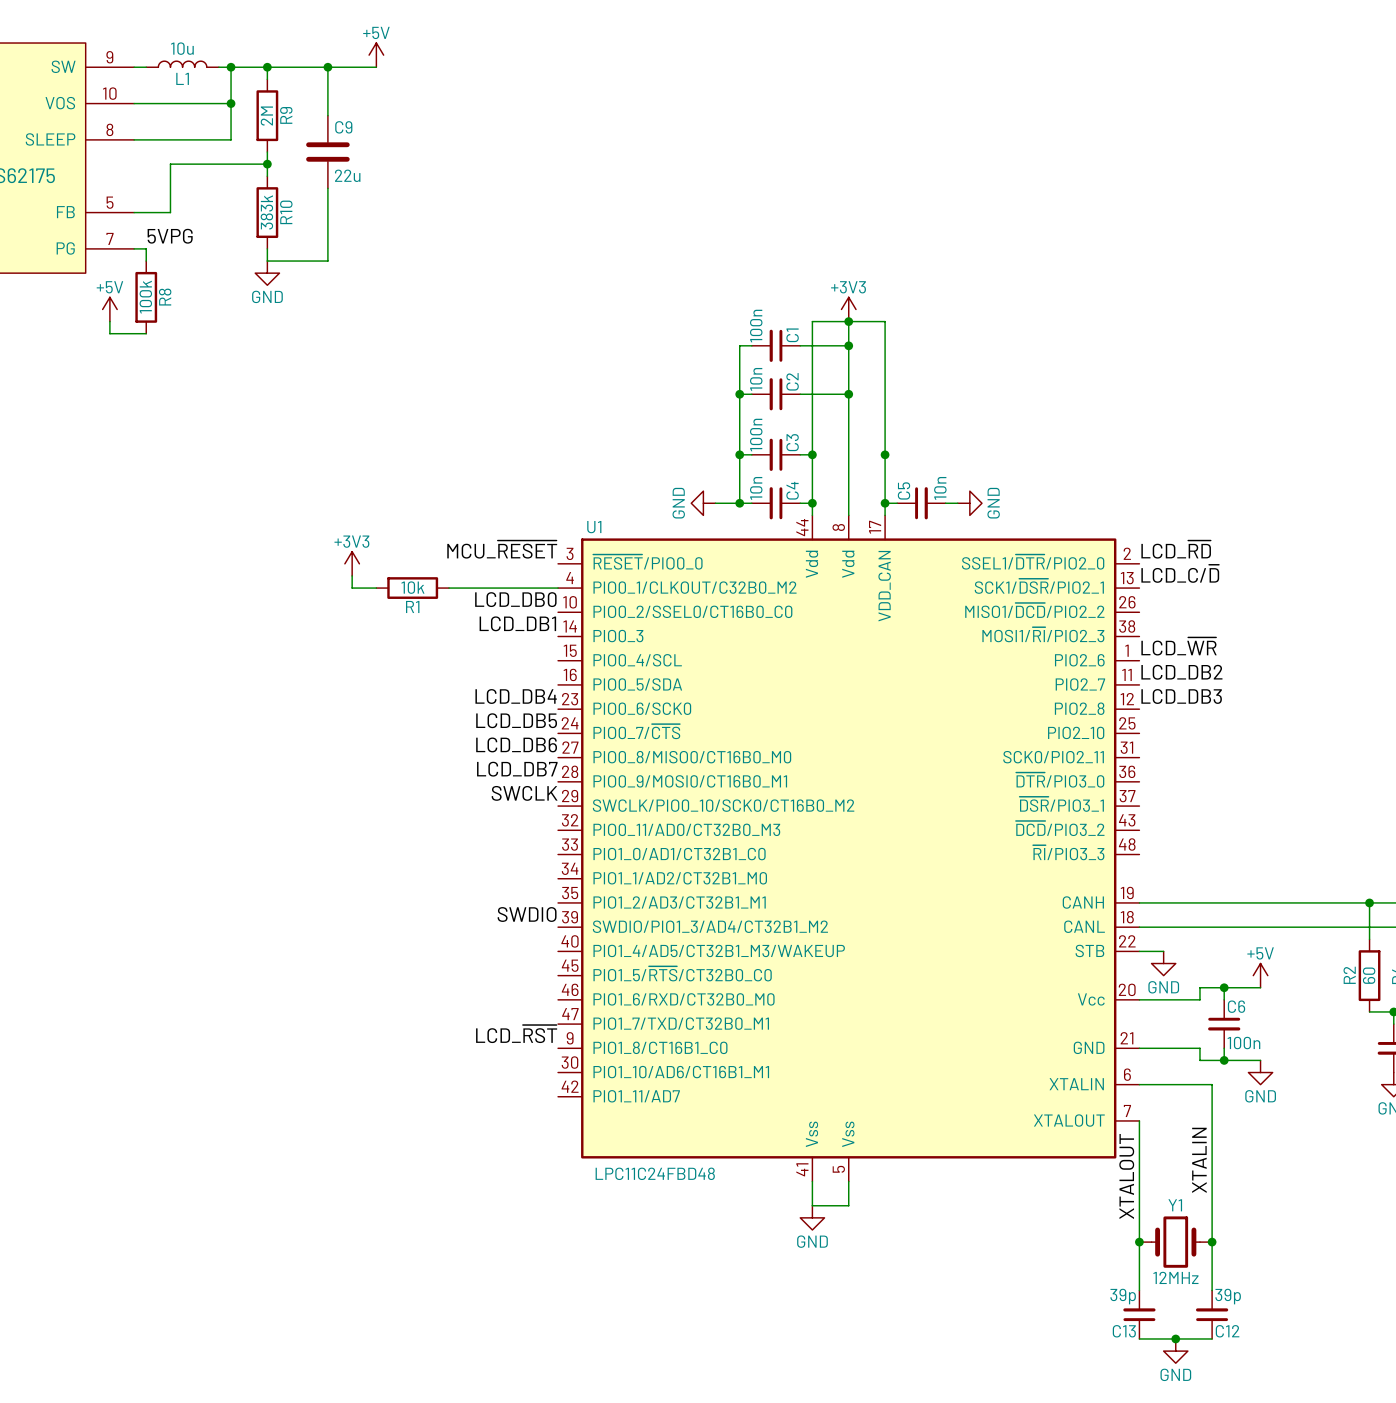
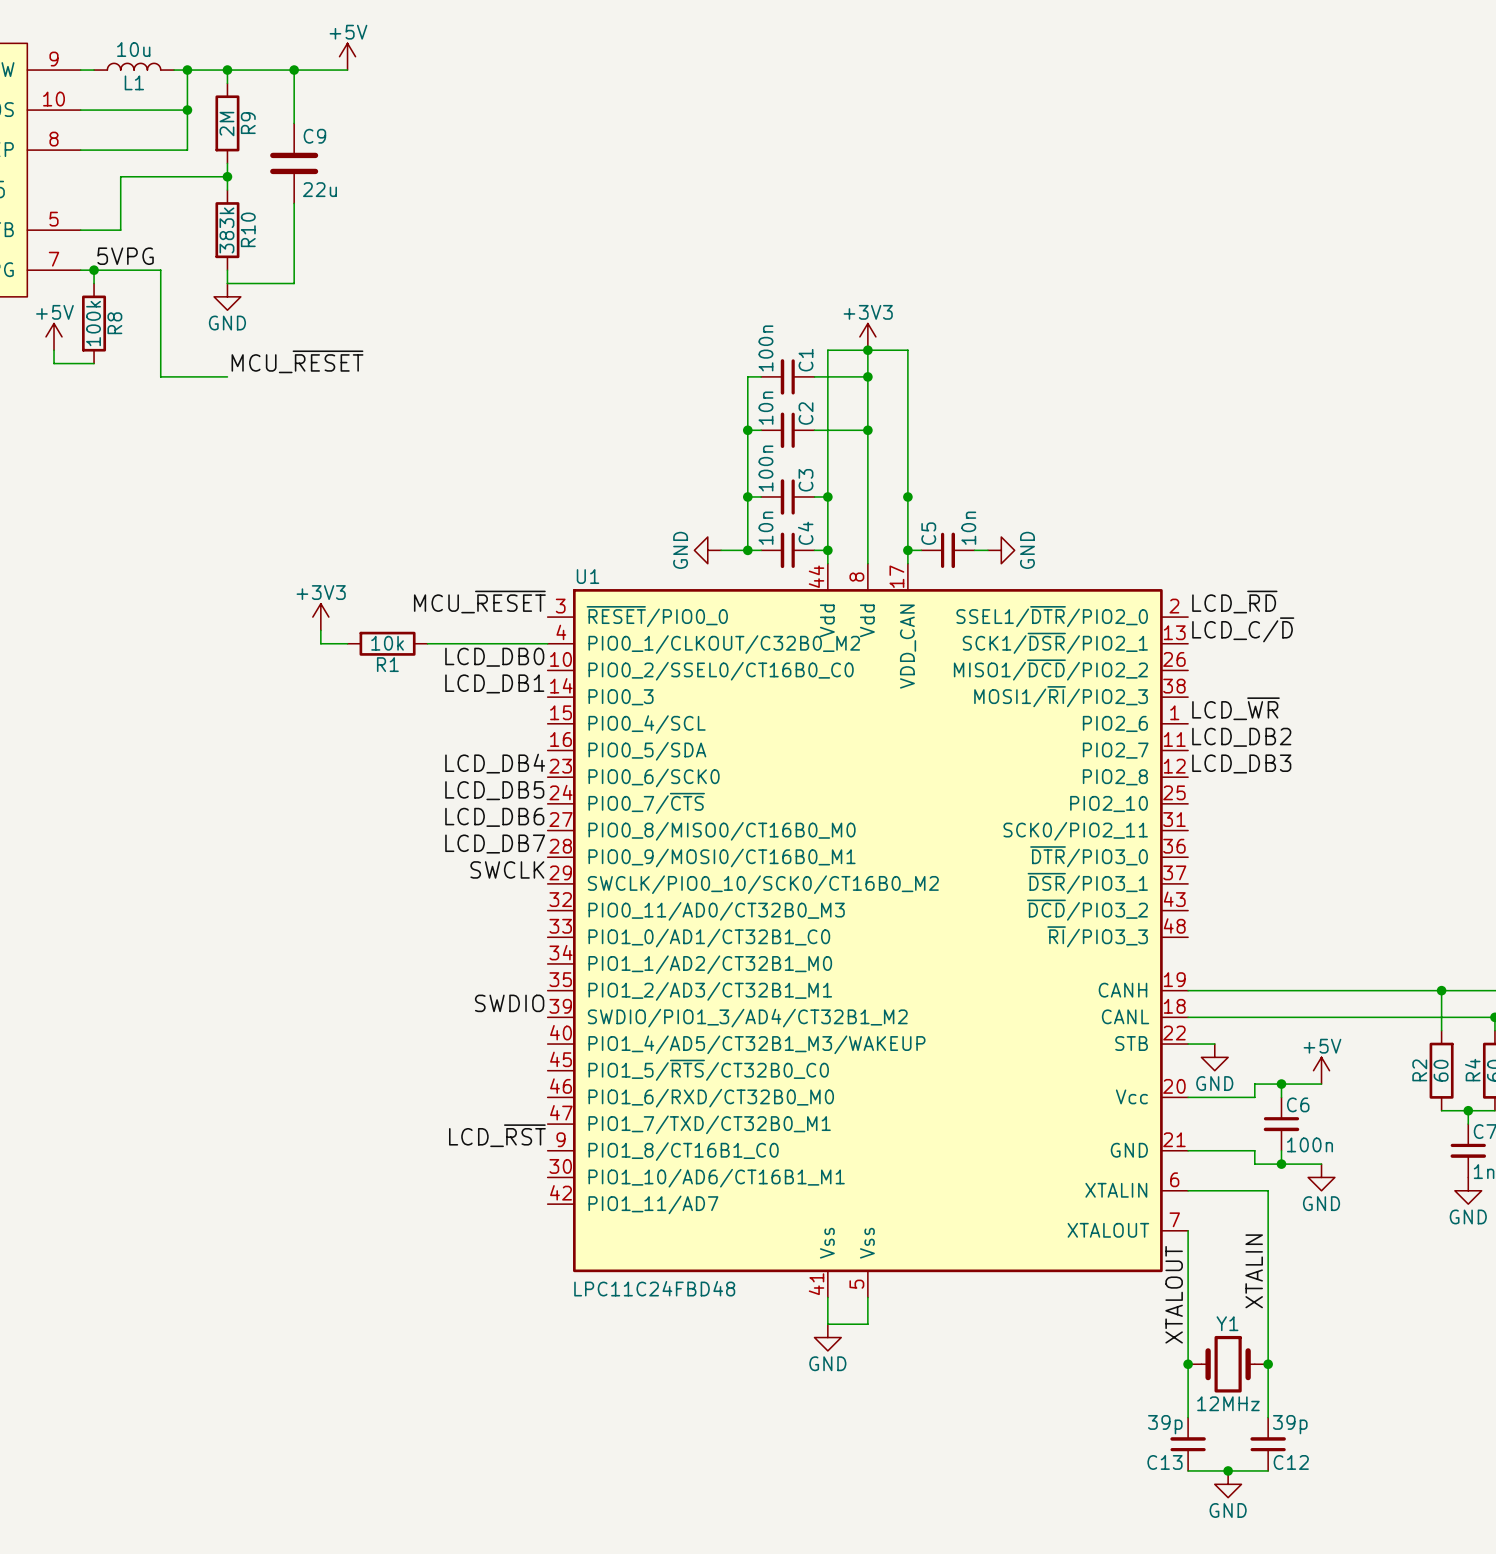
wire: none -> (94, 270) (160, 270) (160, 376) (227, 376)
junction: none -> (94, 270)
label: none -> MCU_~{RESET} (297, 361)

